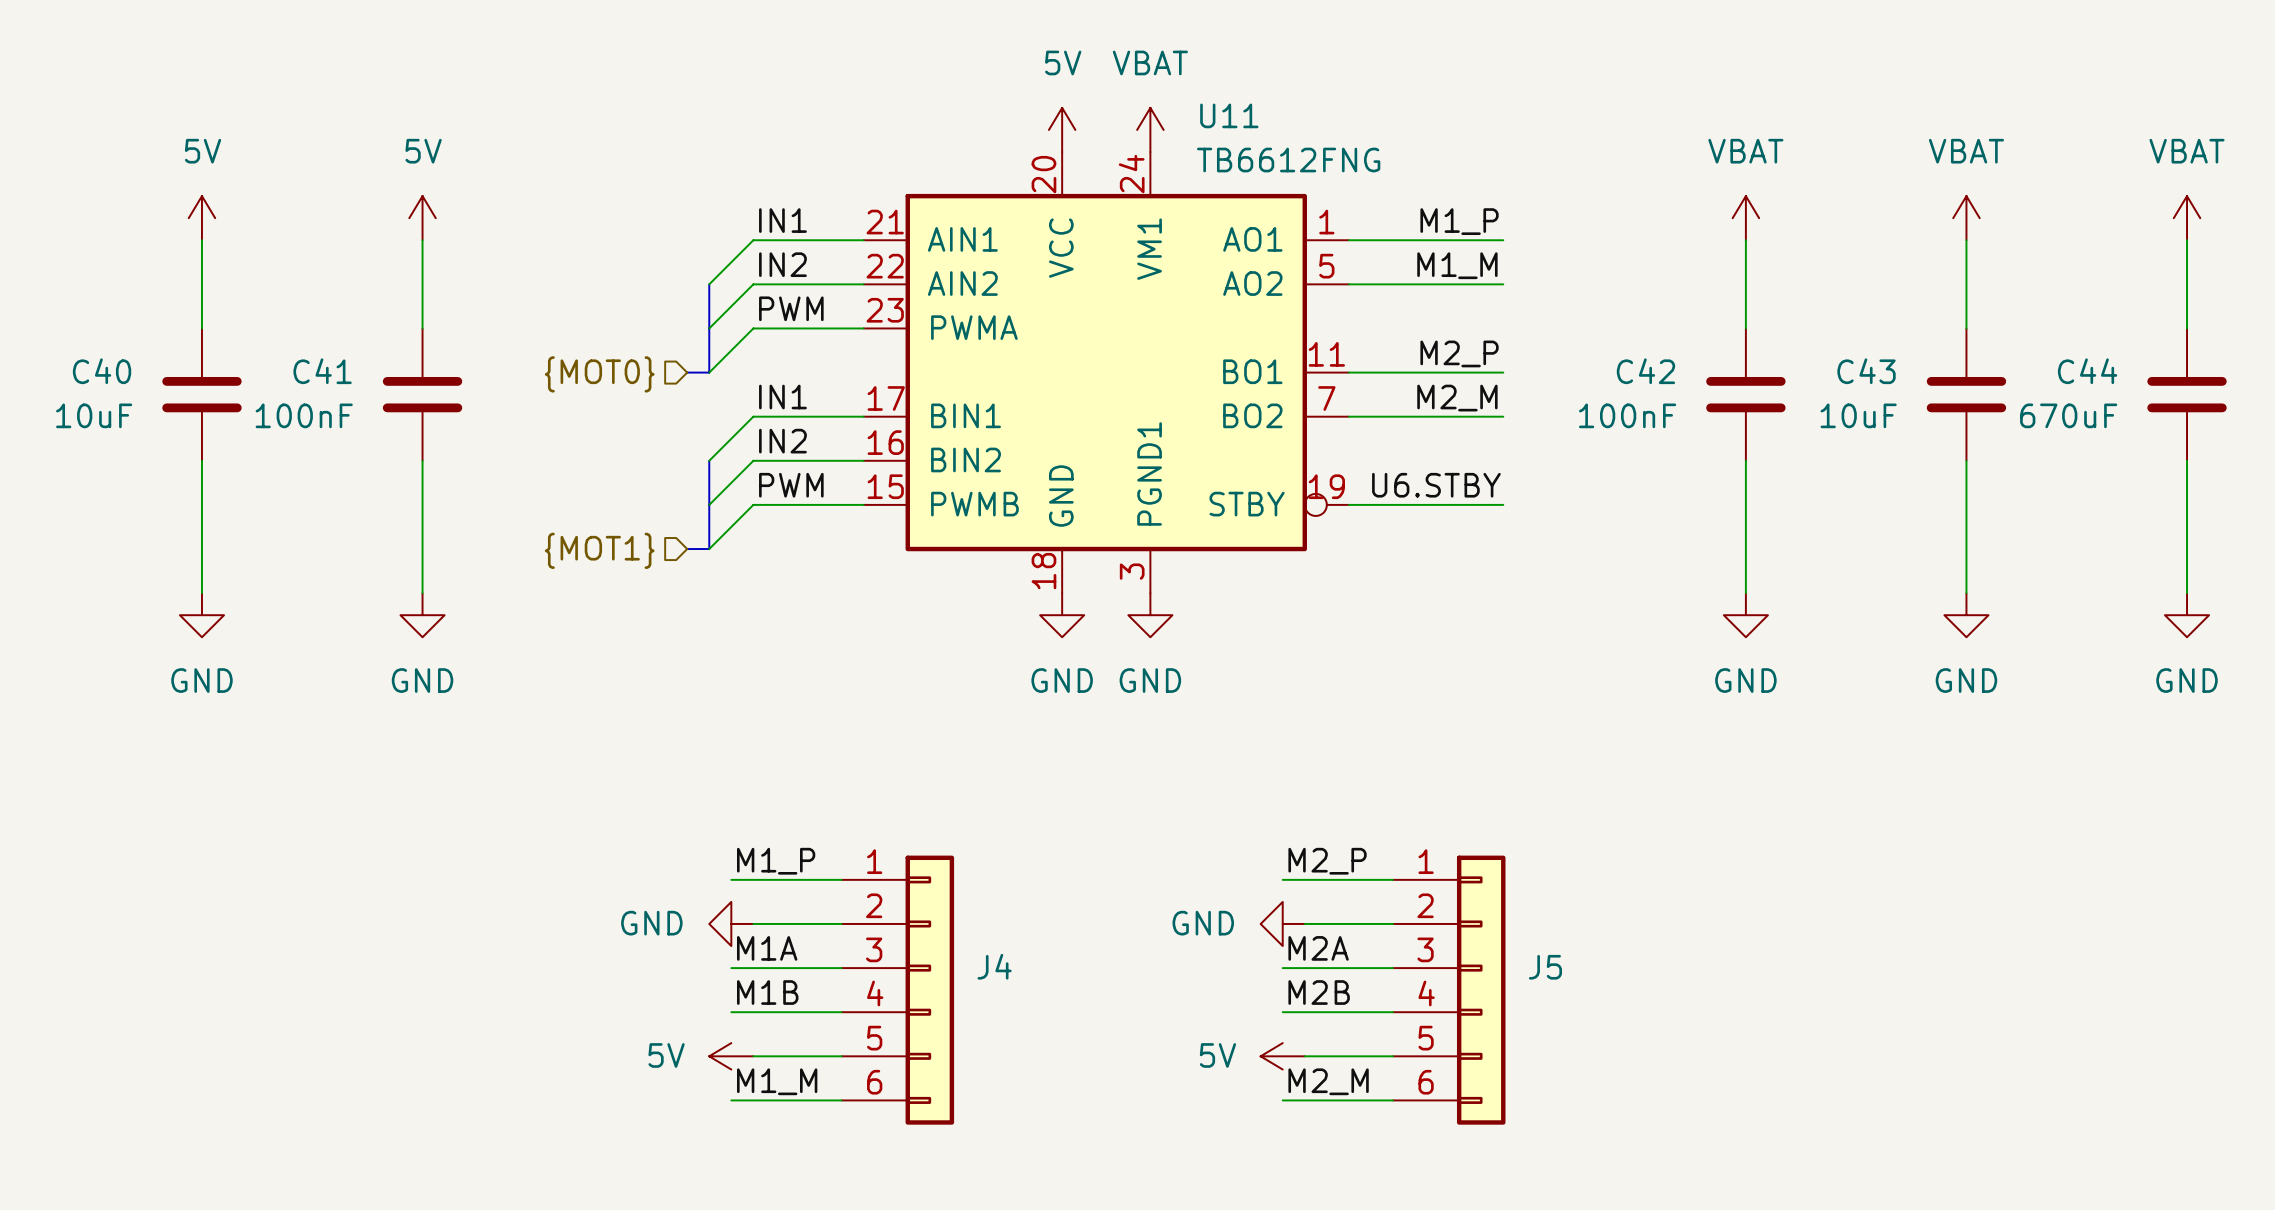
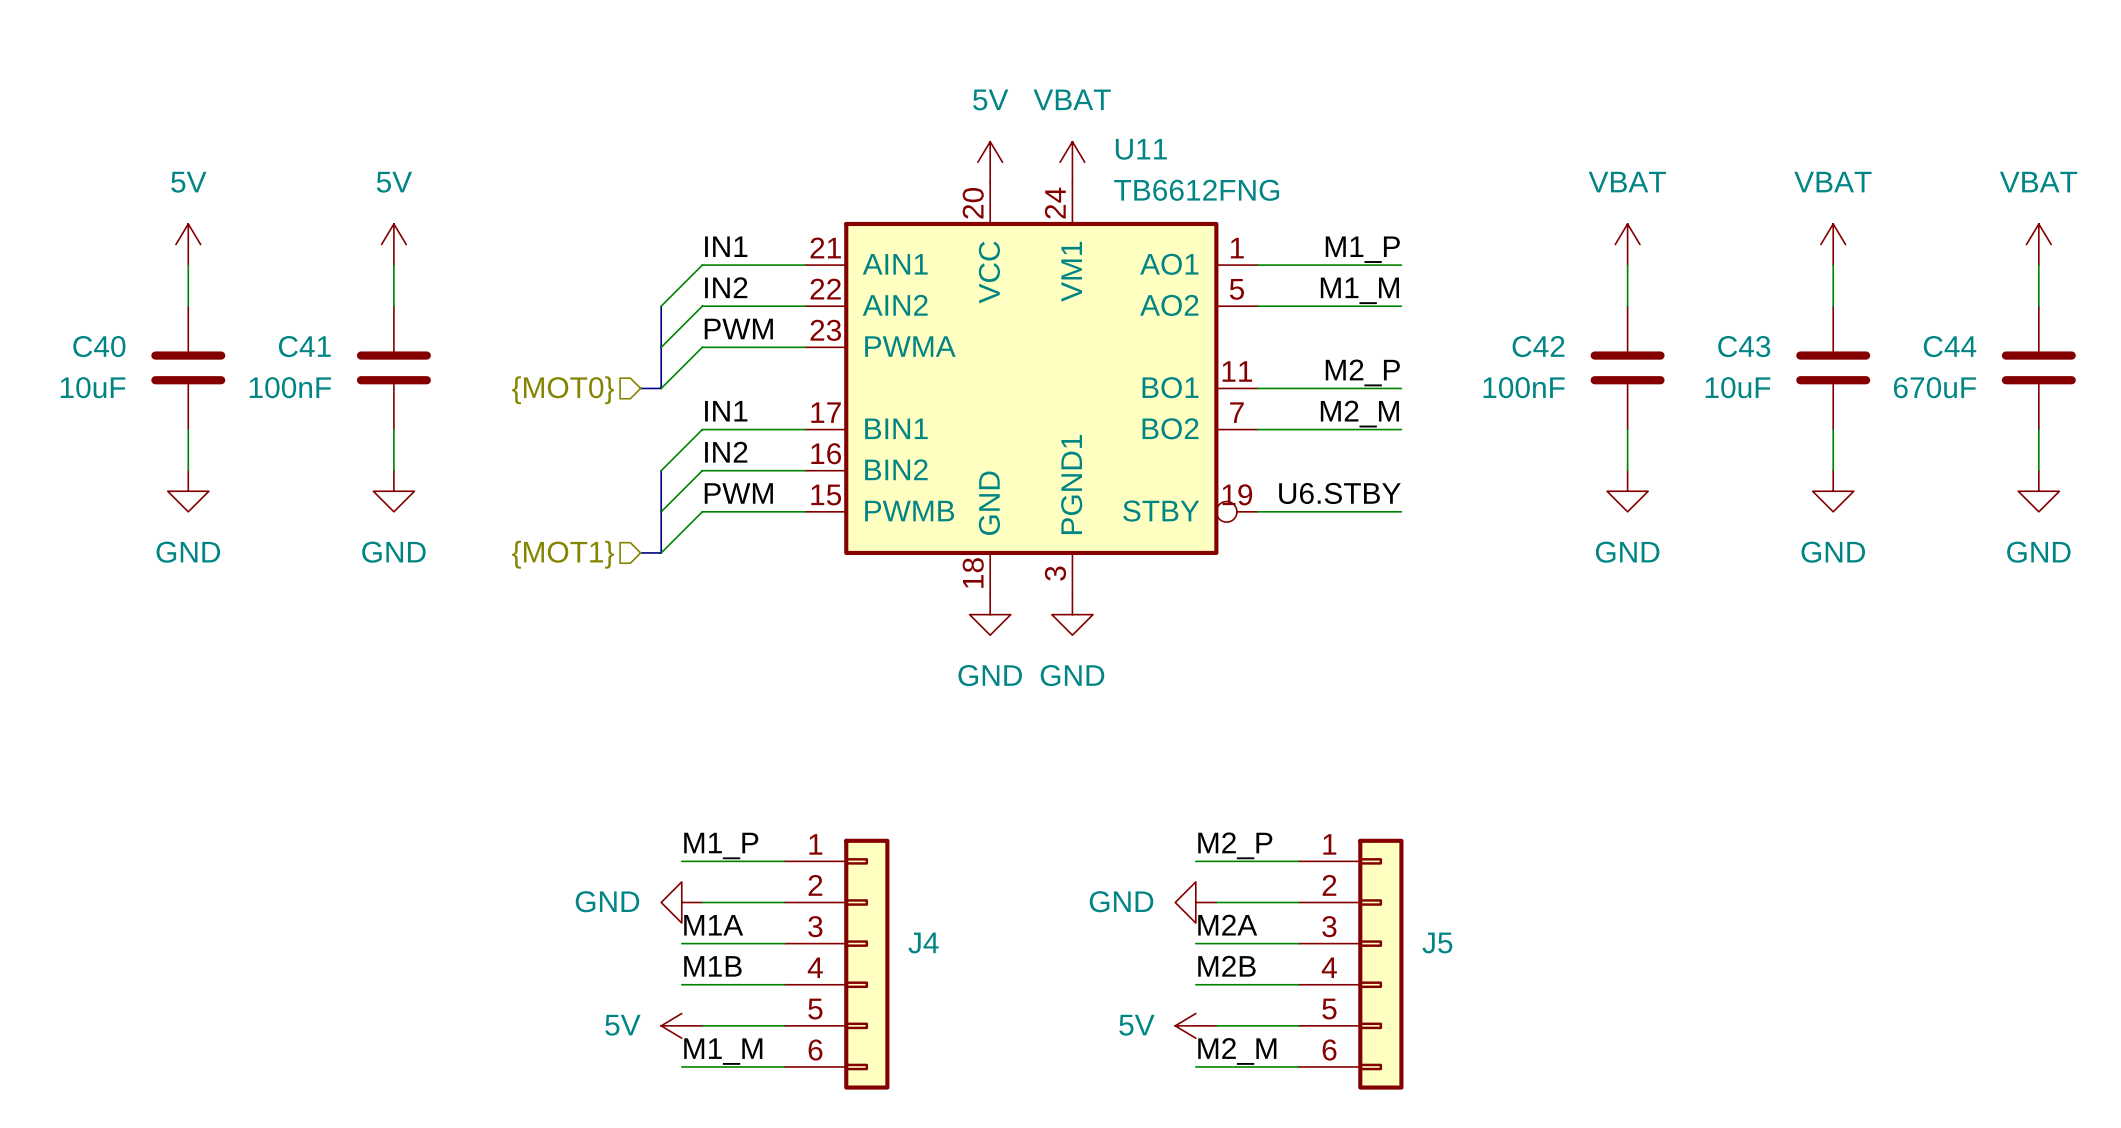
power symbol position: 5V (1062, 129) -> 5V (990, 162)
power symbol position: VBAT (1150, 129) -> VBAT (1072, 162)
power symbol position: 5V (201, 218) -> 5V (188, 244)
power symbol position: 5V (422, 218) -> 5V (393, 244)
power symbol position: VBAT (1745, 218) -> VBAT (1627, 244)
power symbol position: VBAT (1966, 218) -> VBAT (1833, 244)
power symbol position: VBAT (2187, 218) -> VBAT (2038, 244)
label: IN1 (782, 220) -> none
label: M1_P (1459, 221) -> none
wire: (863, 240) (753, 240) (709, 284) -> (805, 511) (702, 511) (661, 552)
wire: (1348, 240) (1503, 240) -> (1257, 511) (1401, 511)
label: IN2 (782, 264) -> IN1 (726, 246)
label: M1_M (1457, 265) -> M1_P (1362, 249)
bus: (709, 284) (709, 328) -> none
label: PWM (791, 308) -> IN2 (726, 287)
label: none -> M1_M (1359, 290)
label: none -> PWM (738, 328)
label: M2_P (1459, 353) -> none
bus: (687, 372) (709, 372) -> (640, 388) (661, 388) (661, 347)
U11 position: (1106, 372) -> (1031, 388)
wire: (1348, 372) (1503, 372) -> (1257, 306) (1401, 306)
hierarchical label position: {MOT0} (599, 374) -> {MOT0} (563, 390)
label: IN1 (782, 397) -> none
label: M2_M (1457, 398) -> M2_P (1362, 372)
wire: (863, 416) (753, 416) (709, 460) -> (805, 347) (702, 347) (661, 388)
label: IN2 (782, 441) -> IN1 (726, 411)
label: none -> M2_M (1359, 414)
bus: (709, 460) (709, 504) -> none
label: PWM (791, 485) -> IN2 (726, 452)
label position: U6.STBY (1436, 485) -> U6.STBY (1339, 493)
wire: (201, 504) (201, 593) -> none
wire: (422, 504) (422, 593) -> none
wire: (1348, 504) (1503, 504) -> (1257, 429) (1401, 429)
wire: (1745, 504) (1745, 593) -> none
wire: (1966, 504) (1966, 593) -> none
wire: (2187, 504) (2187, 593) -> none
label: none -> PWM (738, 493)
bus: (687, 549) (709, 549) -> (640, 552) (661, 552) (661, 511)
hierarchical label position: {MOT1} (599, 550) -> {MOT1} (563, 554)
power symbol position: GND (201, 615) -> GND (188, 491)
power symbol position: GND (422, 615) -> GND (393, 491)
power symbol position: GND (1062, 615) -> GND (990, 614)
power symbol position: GND (1150, 615) -> GND (1072, 614)
power symbol position: GND (1745, 615) -> GND (1627, 491)
power symbol position: GND (1966, 615) -> GND (1833, 491)
power symbol position: GND (2187, 615) -> GND (2038, 491)
label position: M1_P (776, 861) -> M1_P (721, 845)
label position: M2_P (1327, 861) -> M2_P (1235, 845)
wire: (731, 879) (841, 879) -> (681, 1066) (784, 1066)
wire: (1282, 879) (1393, 879) -> (1195, 1066) (1298, 1066)
power symbol position: GND (731, 923) -> GND (681, 902)
power symbol position: GND (1282, 923) -> GND (1195, 902)
label: M1A (767, 948) -> none
label: M2A (1318, 948) -> none
J4 position: (897, 990) -> (837, 964)
J5 position: (1449, 990) -> (1351, 964)
label: M1B (767, 992) -> M1A (713, 925)
label: M2B (1319, 992) -> M2A (1227, 925)
label: none -> M1B (712, 966)
label: none -> M2B (1226, 966)
power symbol position: 5V (731, 1056) -> 5V (681, 1025)
power symbol position: 5V (1282, 1056) -> 5V (1195, 1025)
label position: M1_M (777, 1081) -> M1_M (723, 1051)
label position: M2_M (1328, 1081) -> M2_M (1237, 1051)

